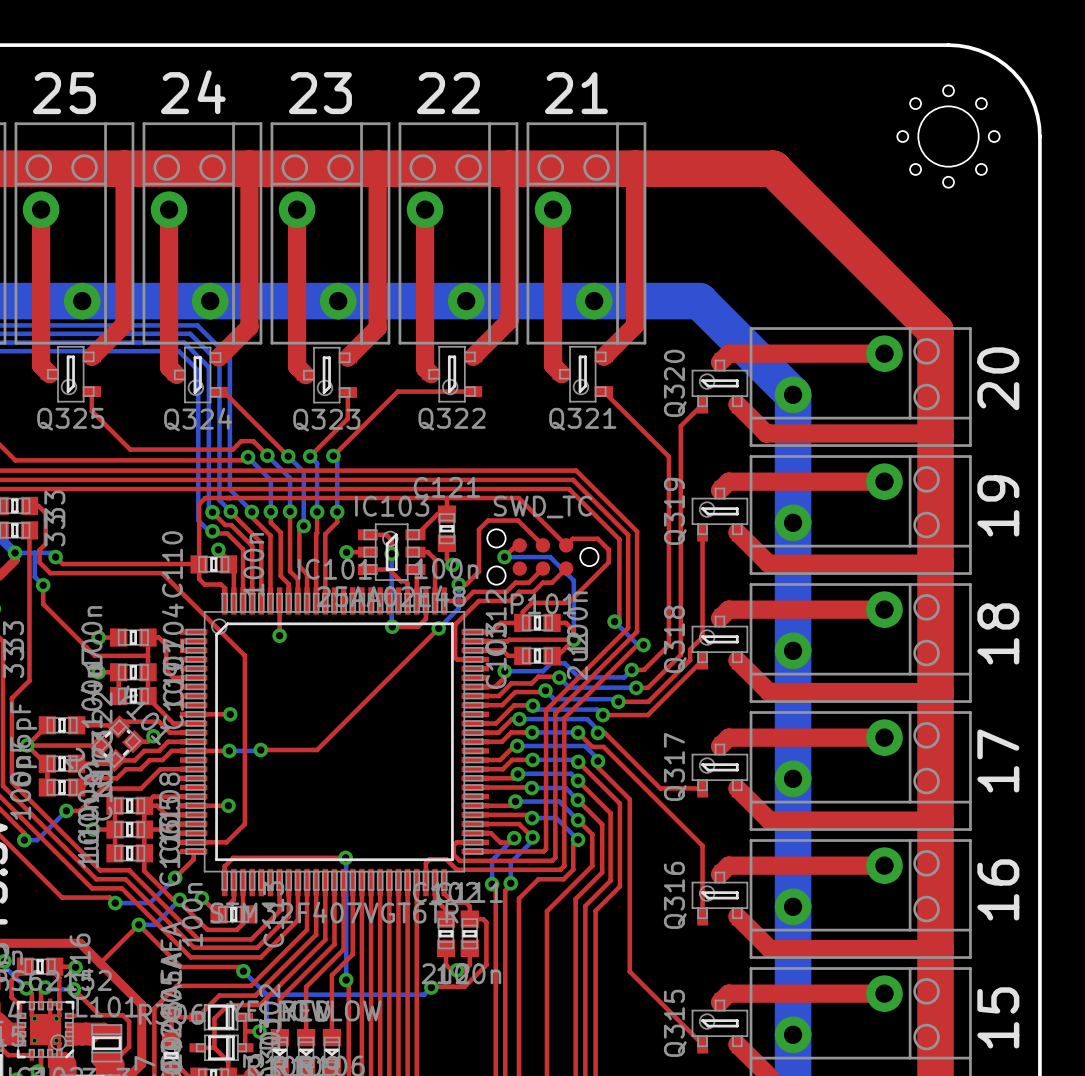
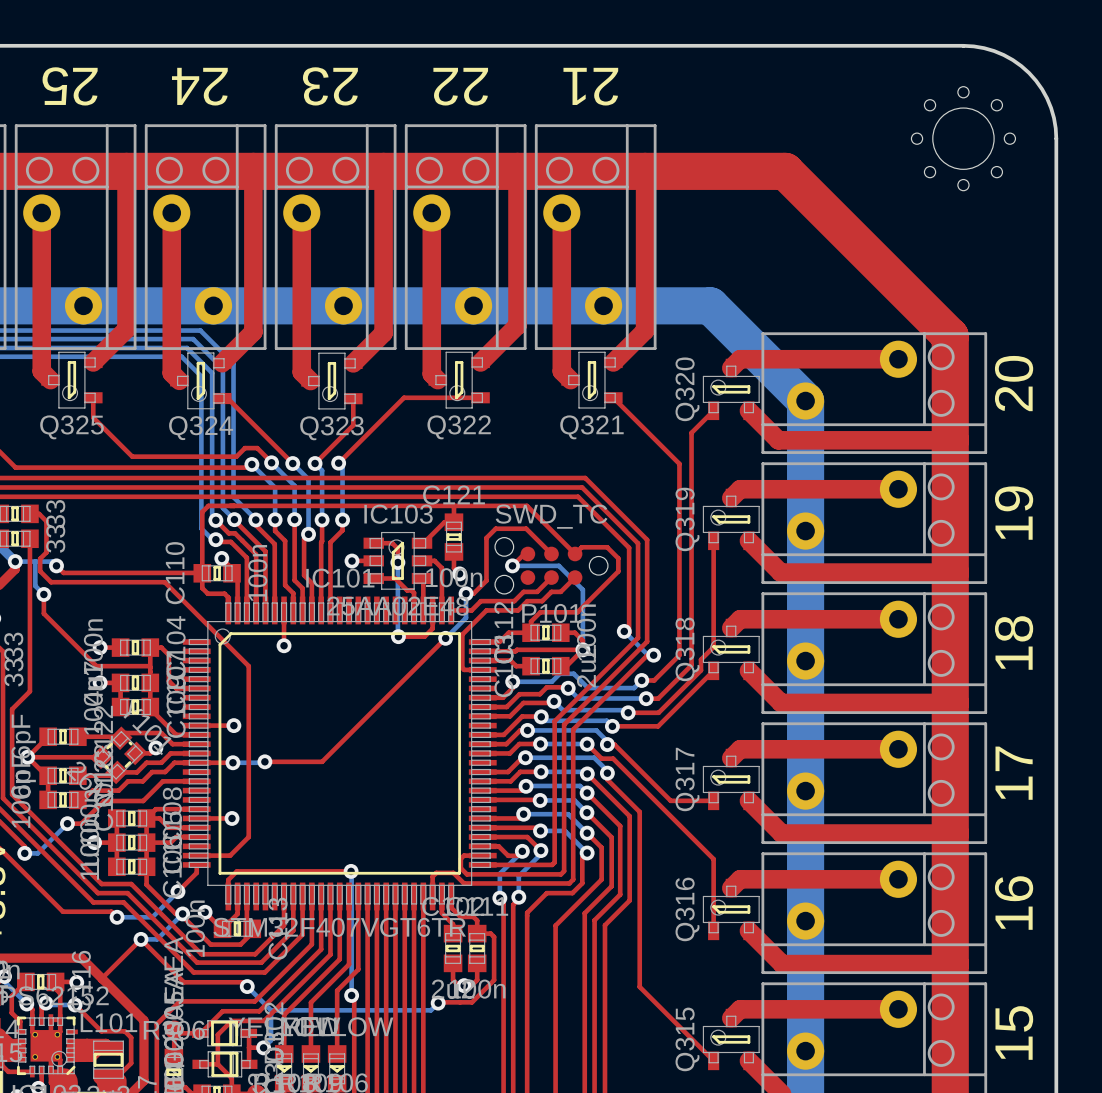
text: none -> 25 (70, 86)
text: none -> 24 (199, 86)
text: none -> 23 (330, 86)
text: none -> 22 (460, 86)
text: none -> 21 (590, 86)
part value: 24 (193, 92) -> none
part value: 25 (64, 93) -> none
part value: 23 (320, 93) -> none
part value: 22 (448, 93) -> none
part value: 21 (576, 93) -> none

